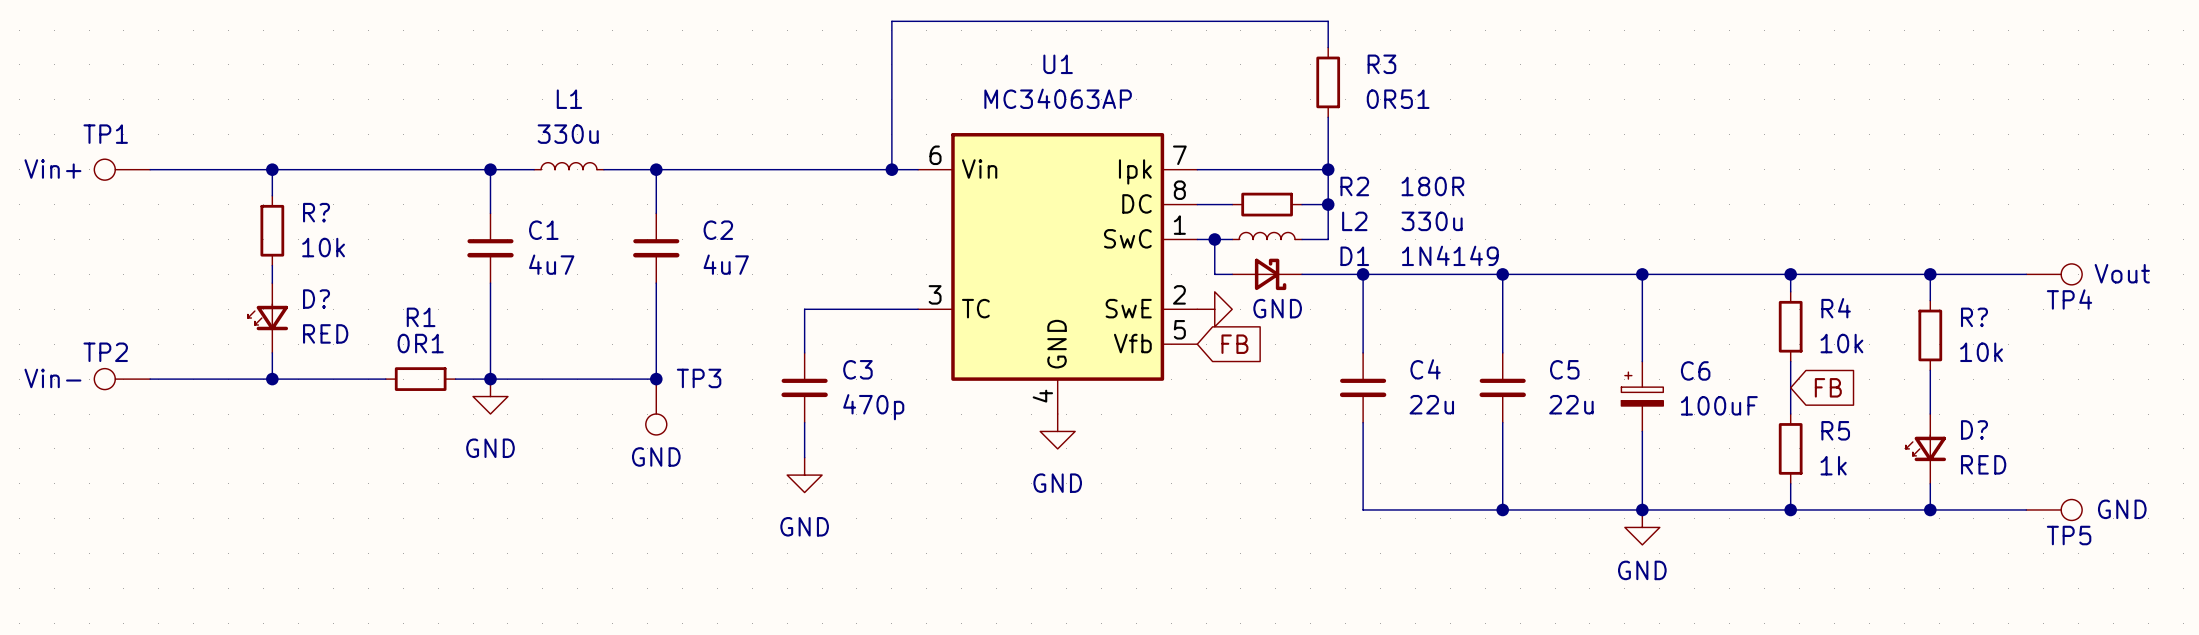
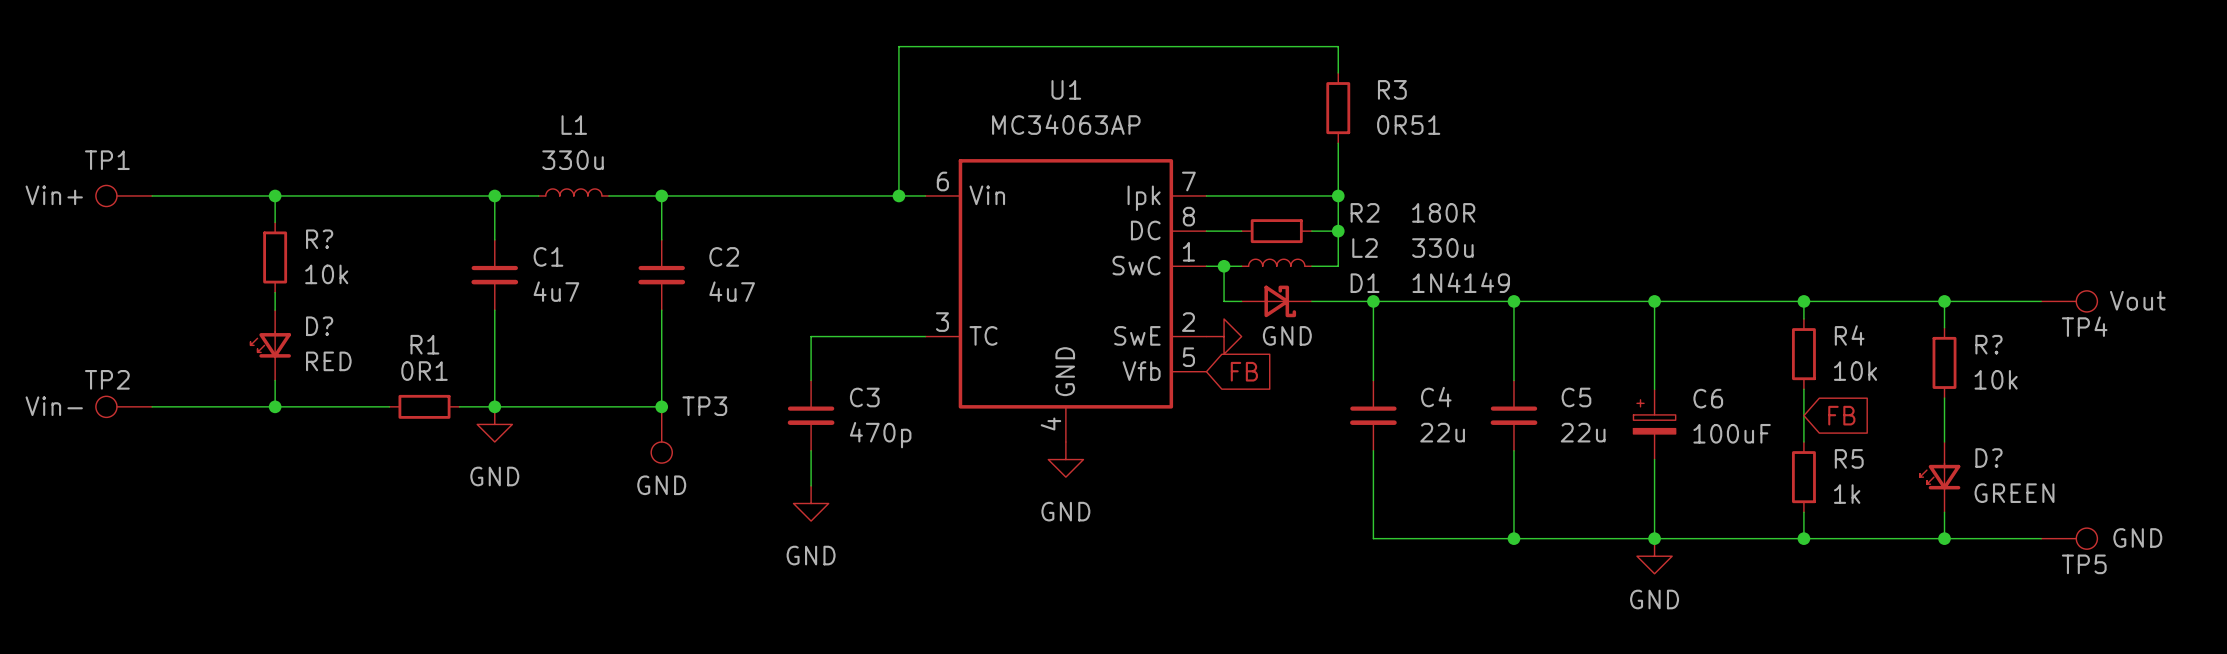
D? value: RED (1983, 464) -> GREEN (2014, 493)

